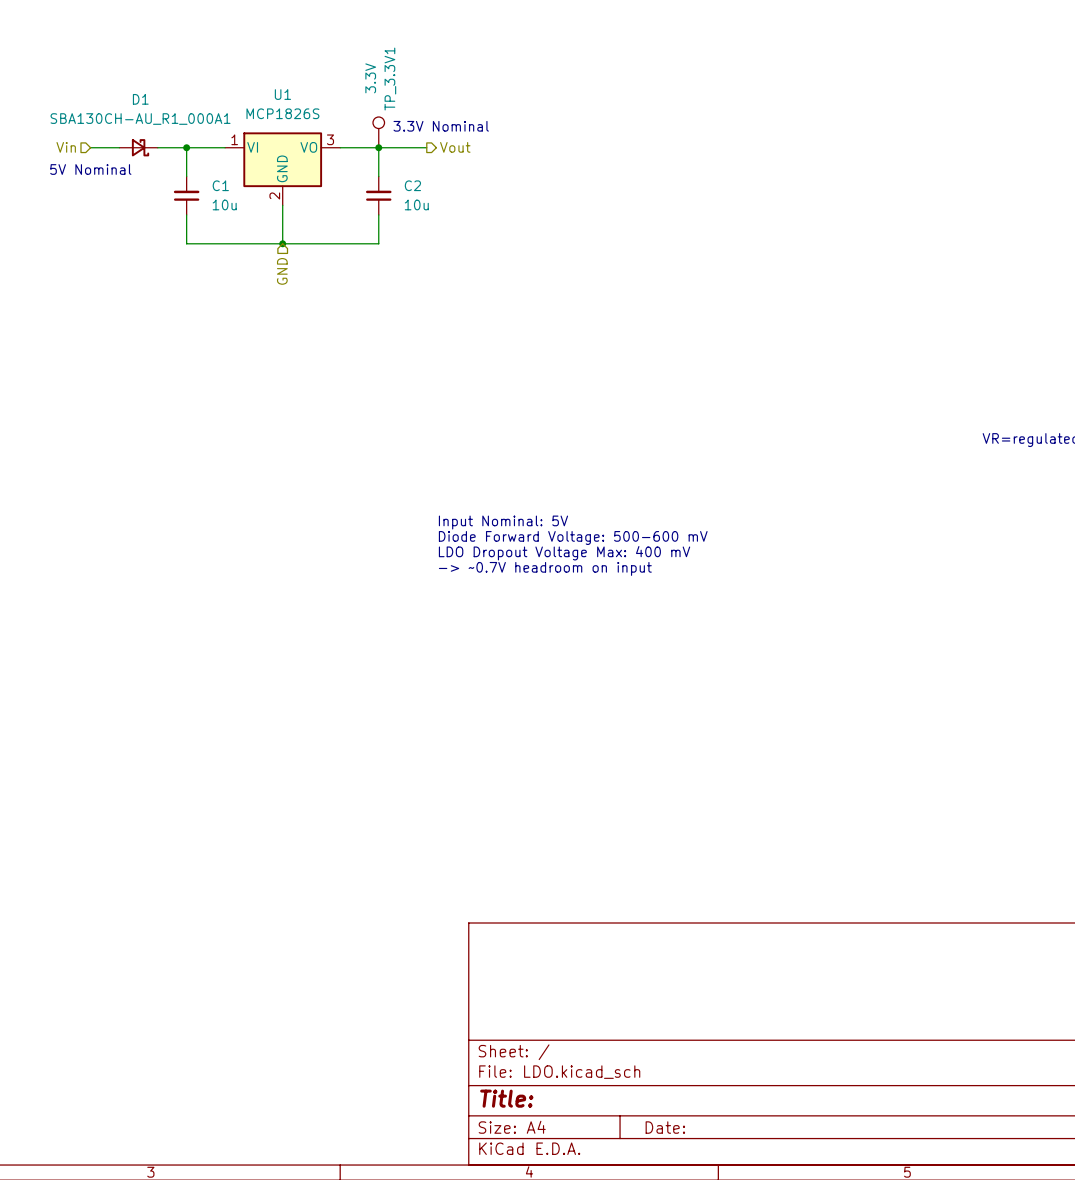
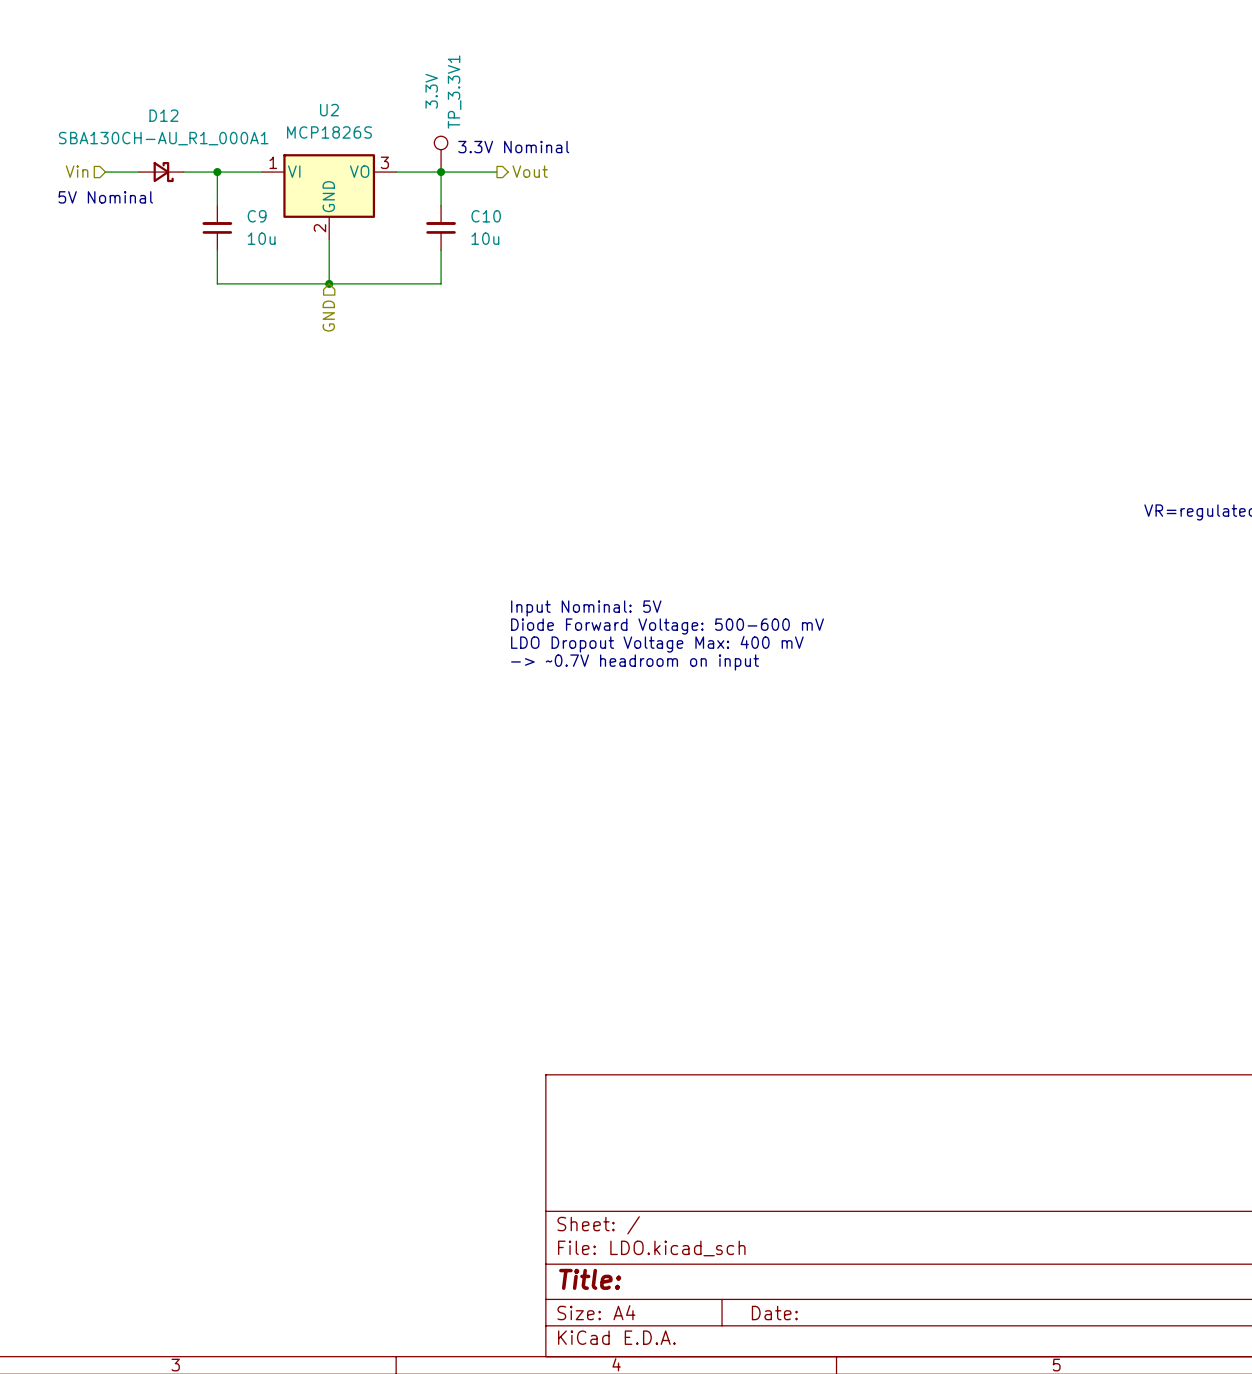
U1 name: U1 (282, 94) -> U2 (329, 110)
D1 name: D1 (140, 99) -> D12 (163, 115)
C1 name: C1 (220, 185) -> C9 (257, 216)
C2 name: C2 (412, 185) -> C10 (486, 216)

